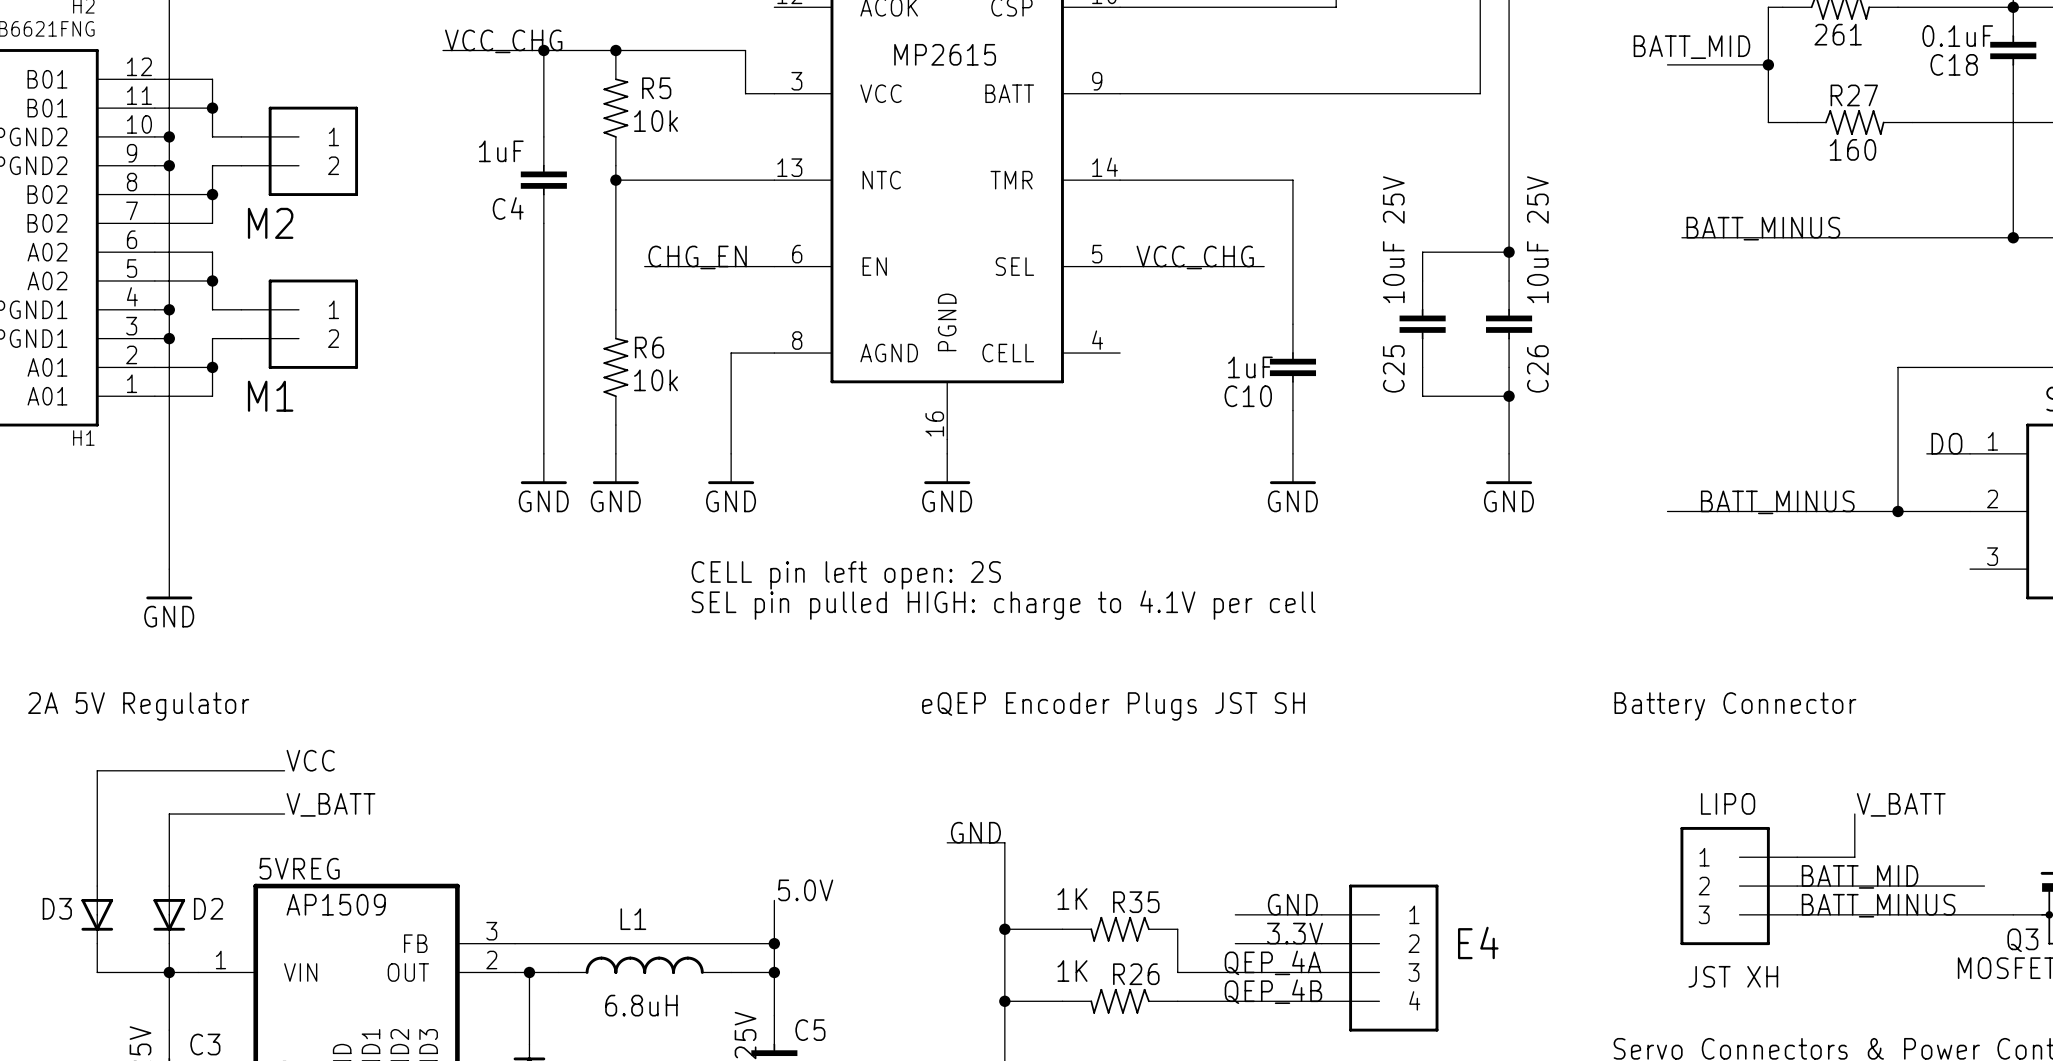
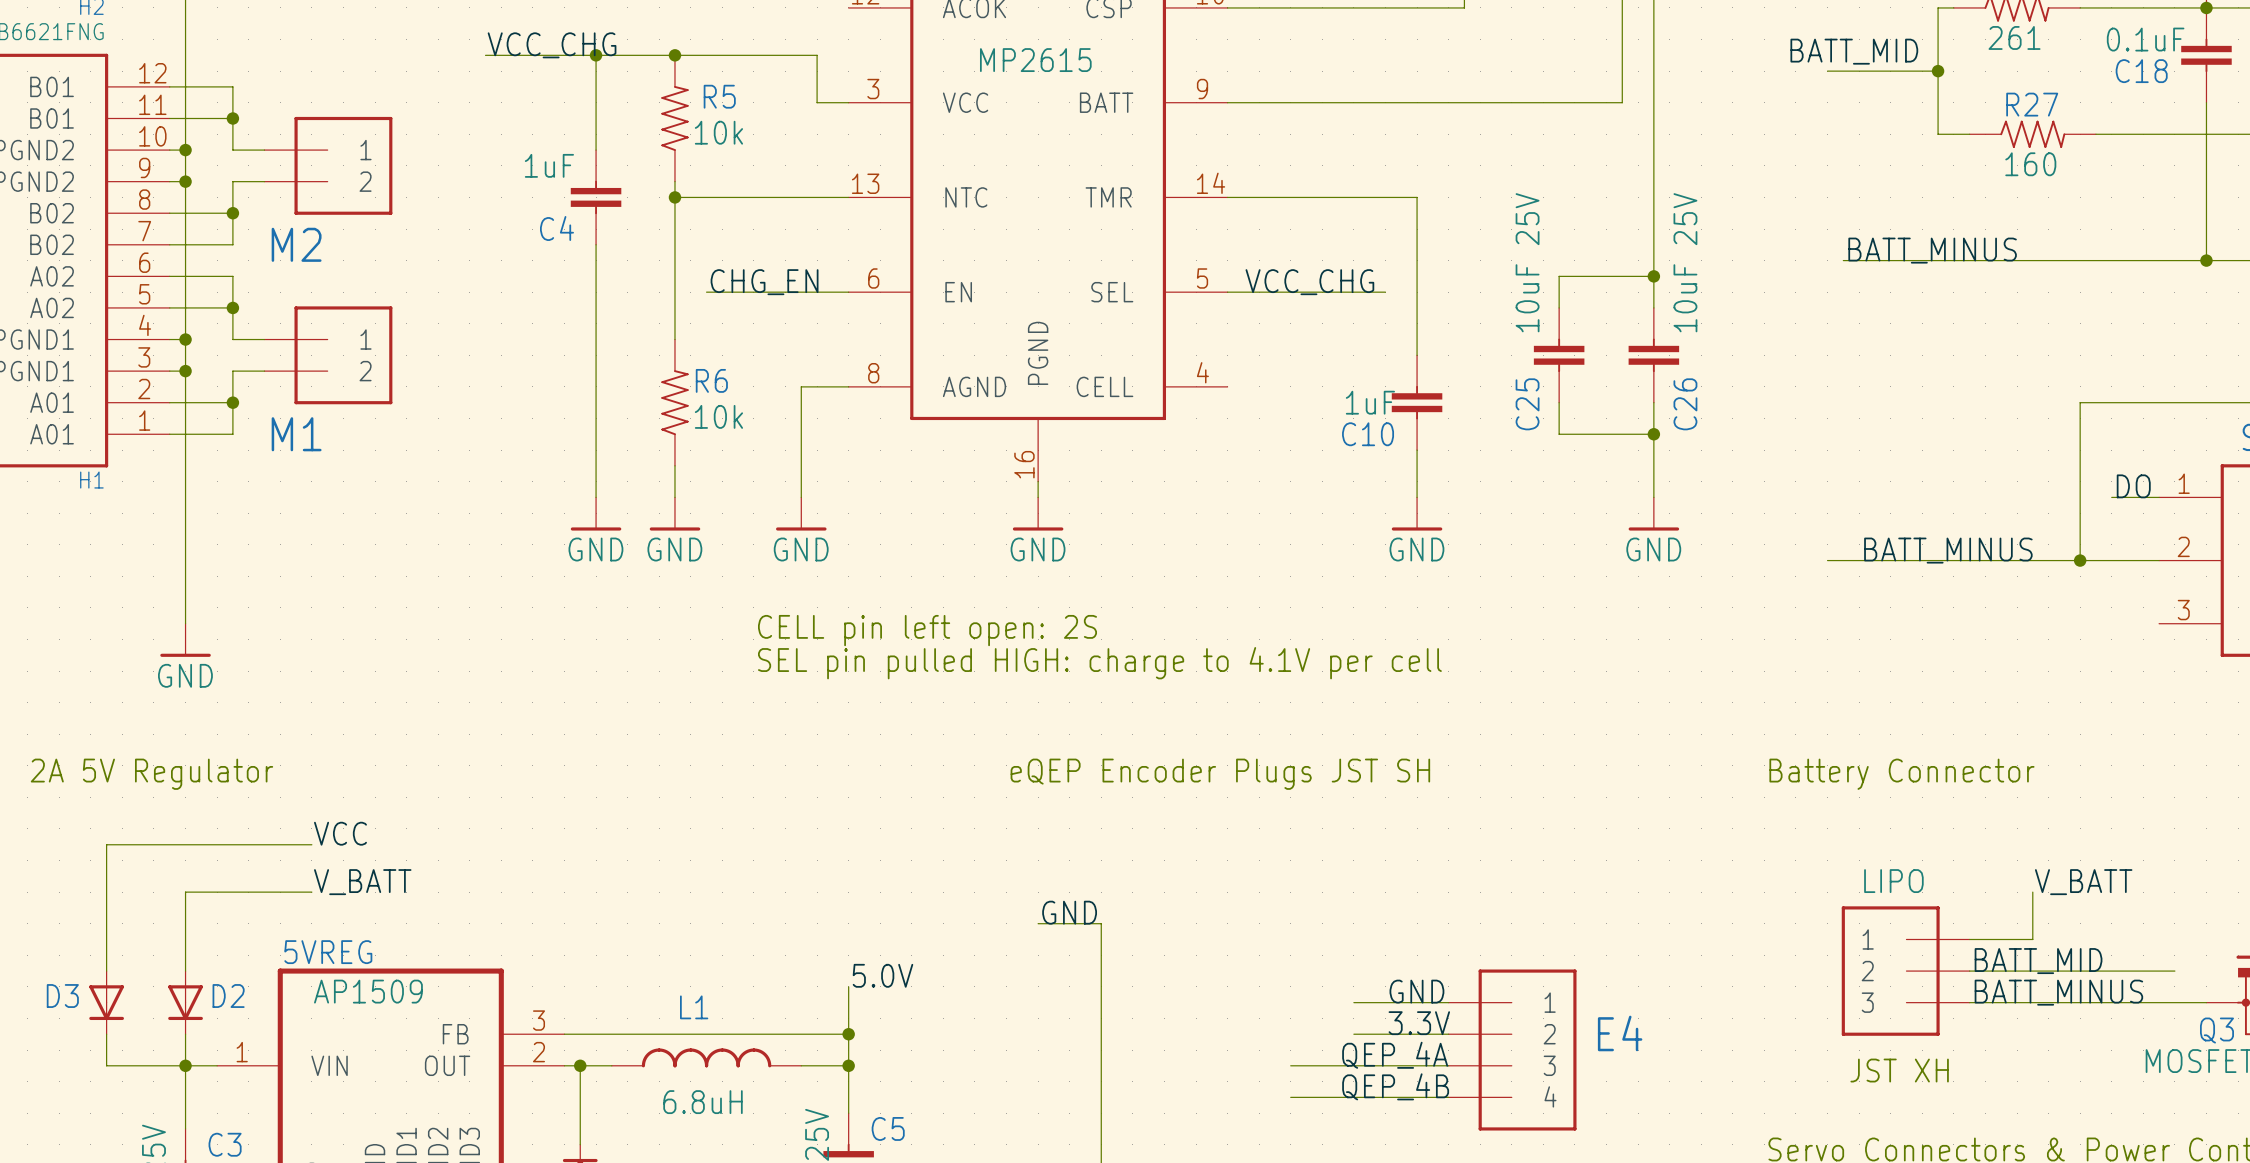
wire: (1004, 929) (1062, 929) -> none
junction: (1004, 929) -> none
R35: 1K (1120, 929) -> none
wire: (1177, 929) (1177, 972) -> none
wire: (1004, 1001) (1062, 1001) -> none
junction: (1004, 1001) -> none
R26: 1K (1120, 1001) -> none

